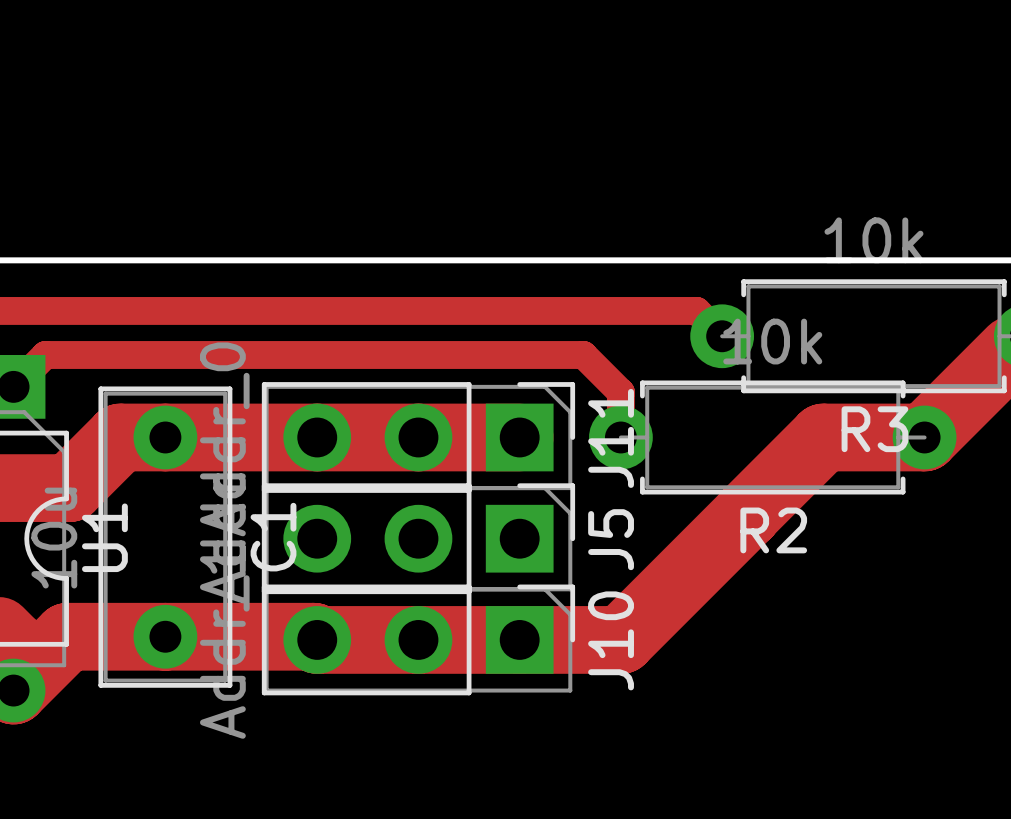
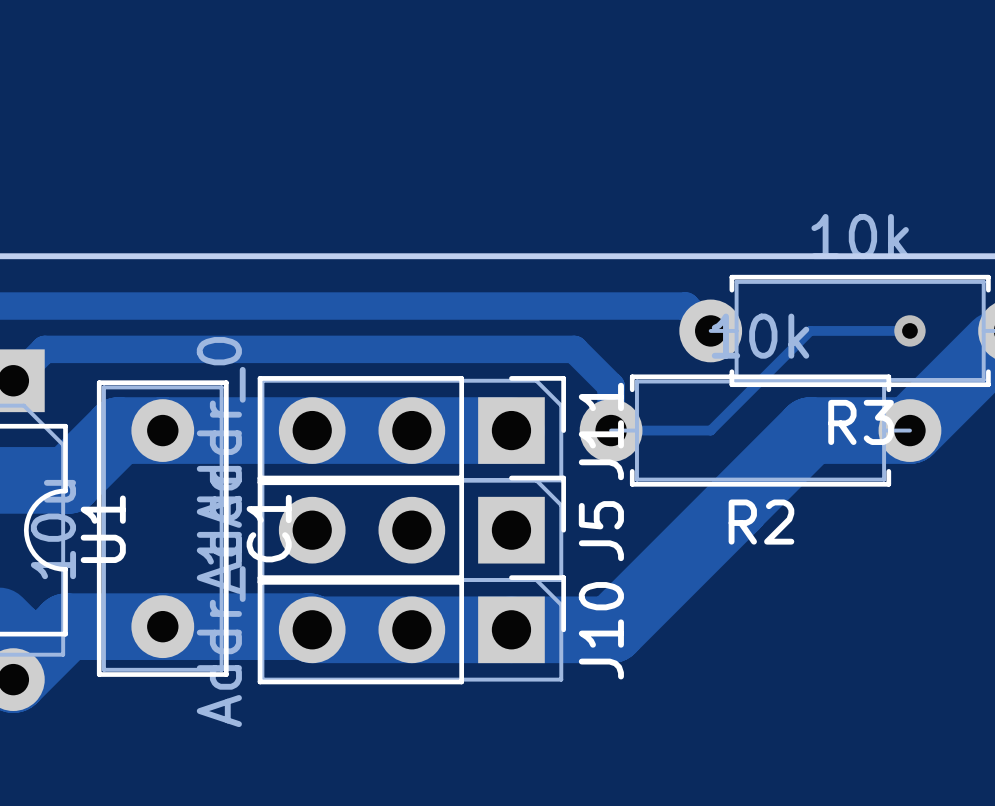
track: none -> (909, 330) (810, 330) (710, 430) (611, 430)
via: none -> (909, 330)

